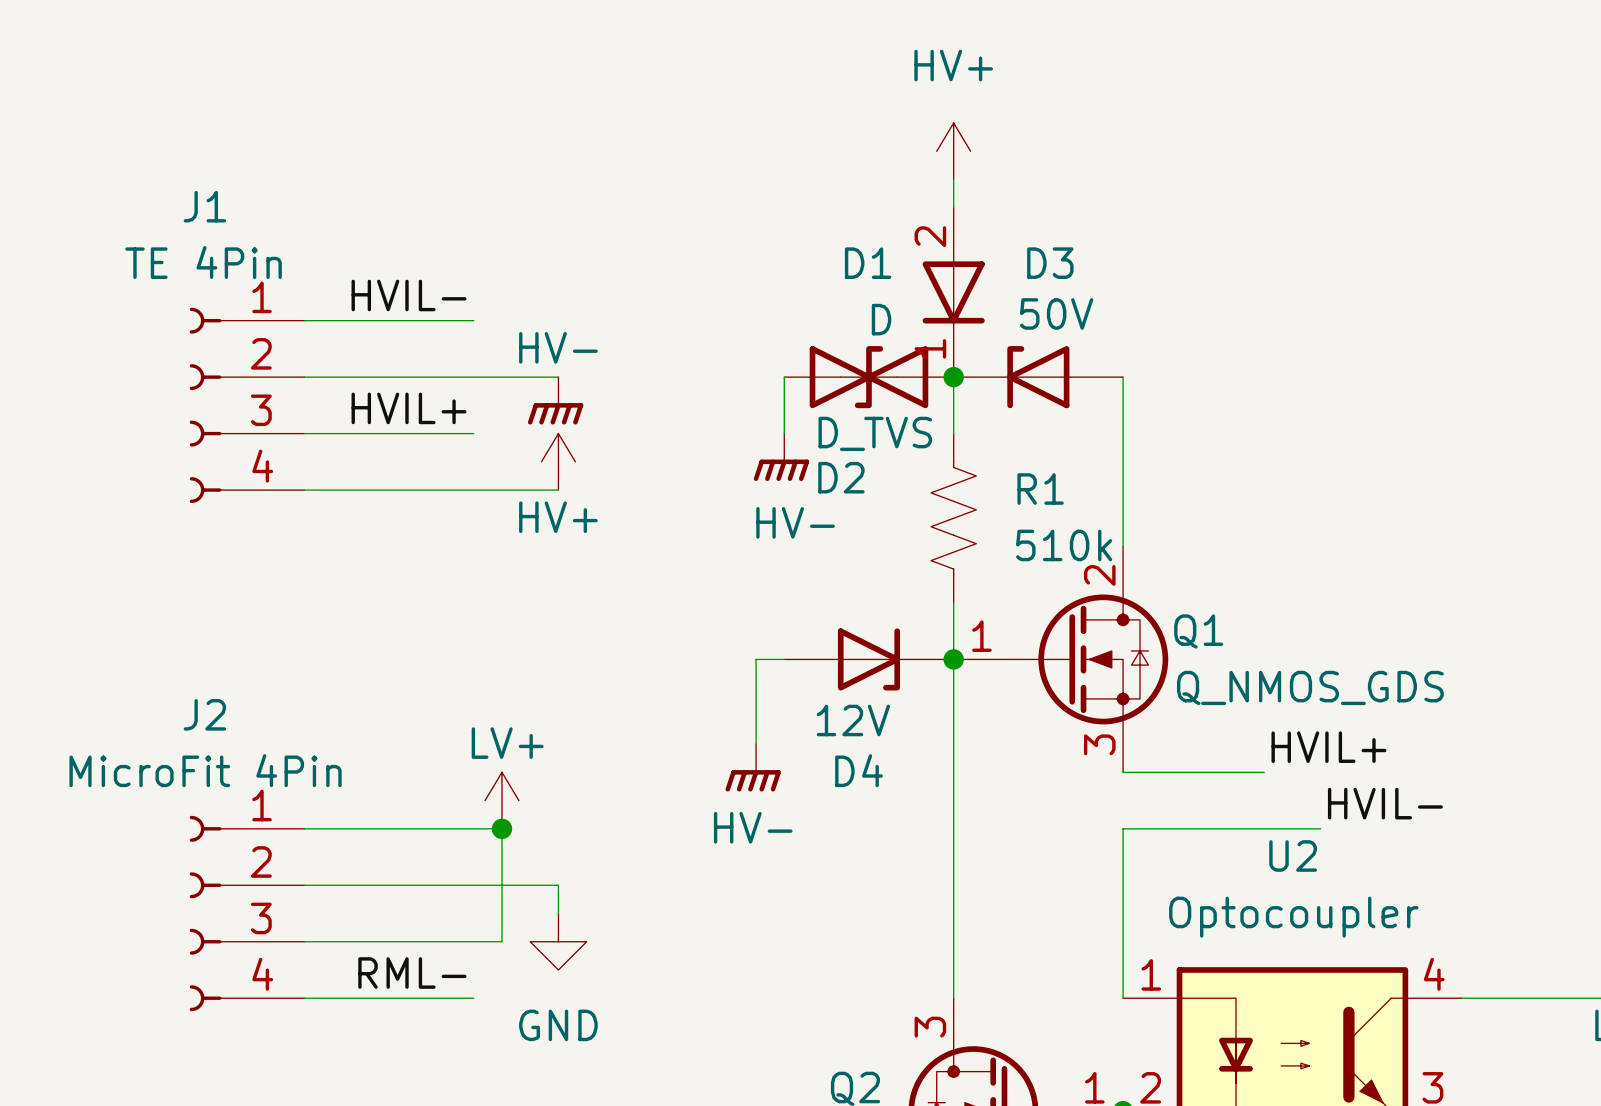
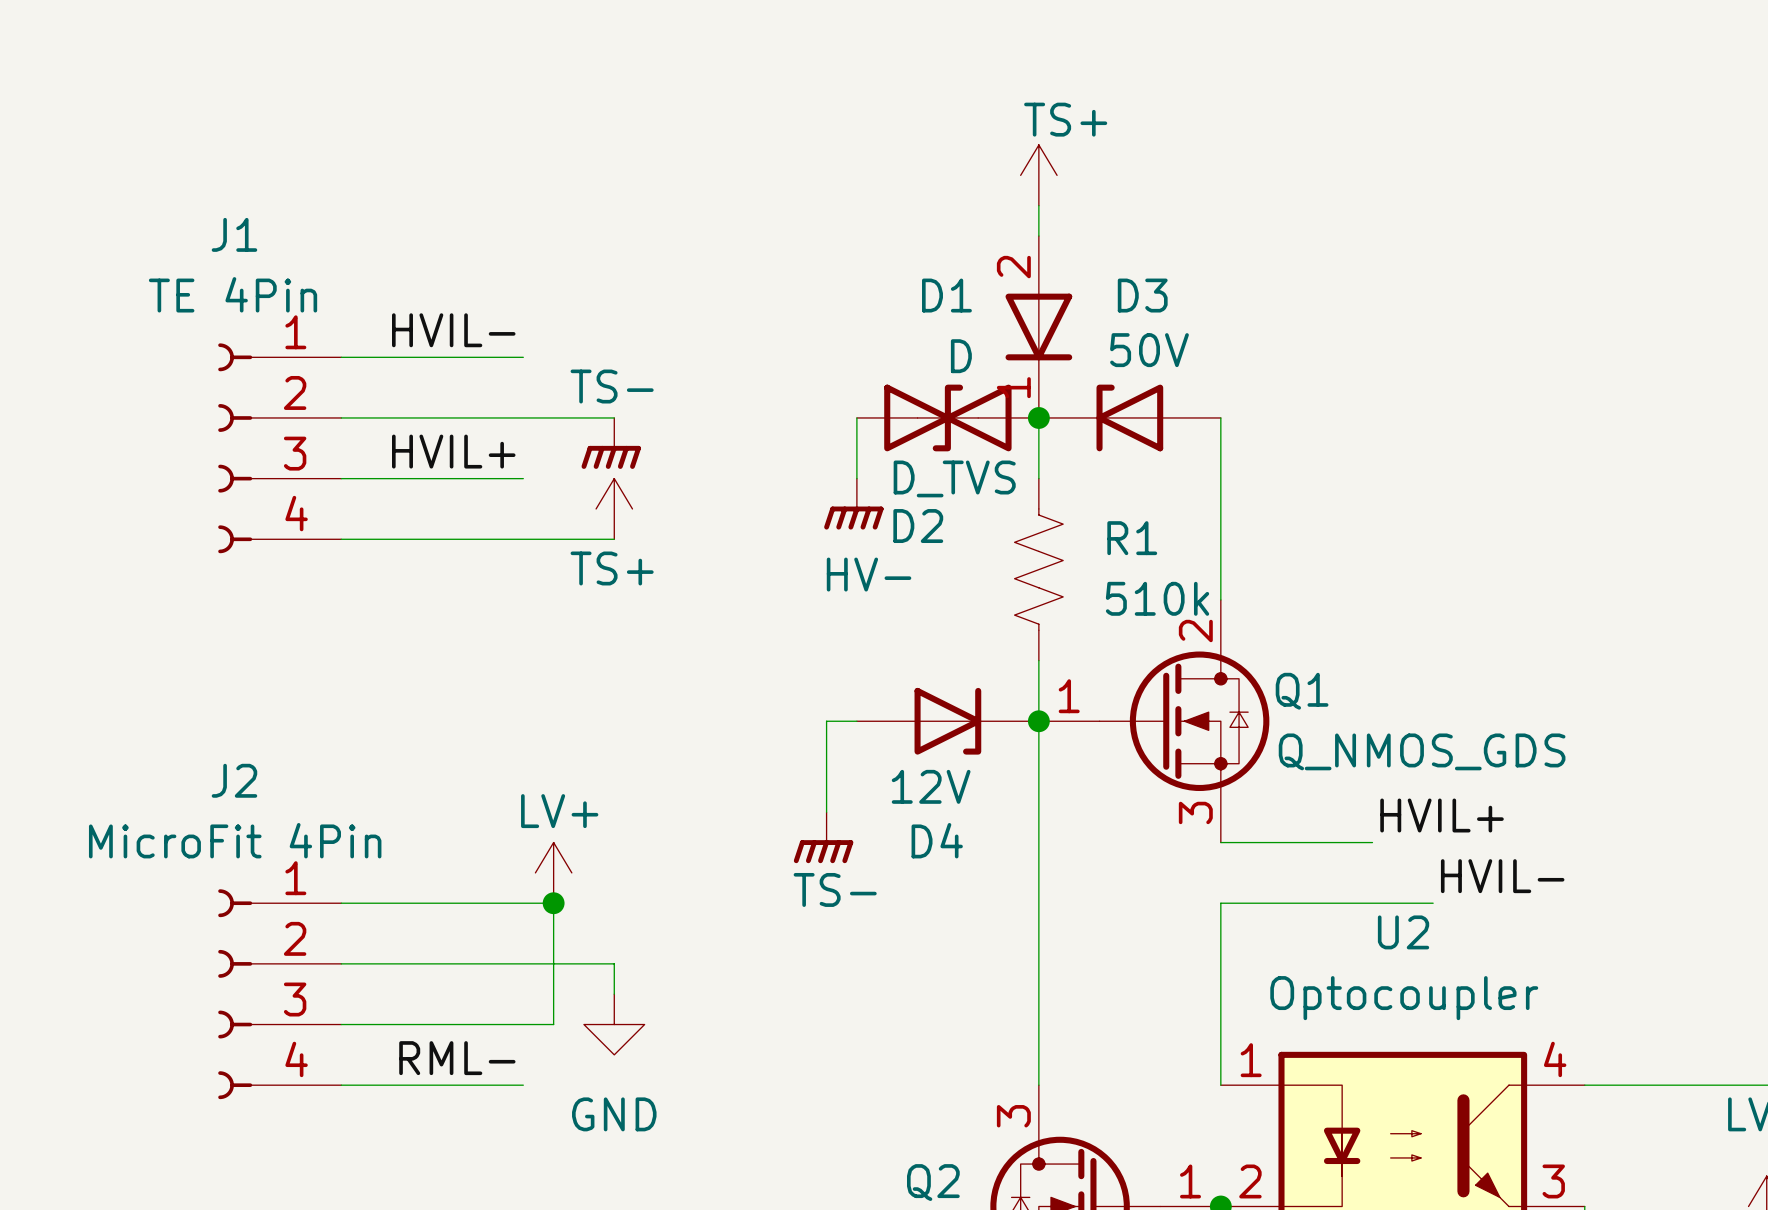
power symbol: HV+ (953, 151) -> TS+ (1038, 175)
power symbol: HV- (555, 400) -> TS- (611, 443)
power symbol: HV+ (558, 461) -> TS+ (614, 508)
power symbol: HV- (753, 767) -> TS- (823, 837)

